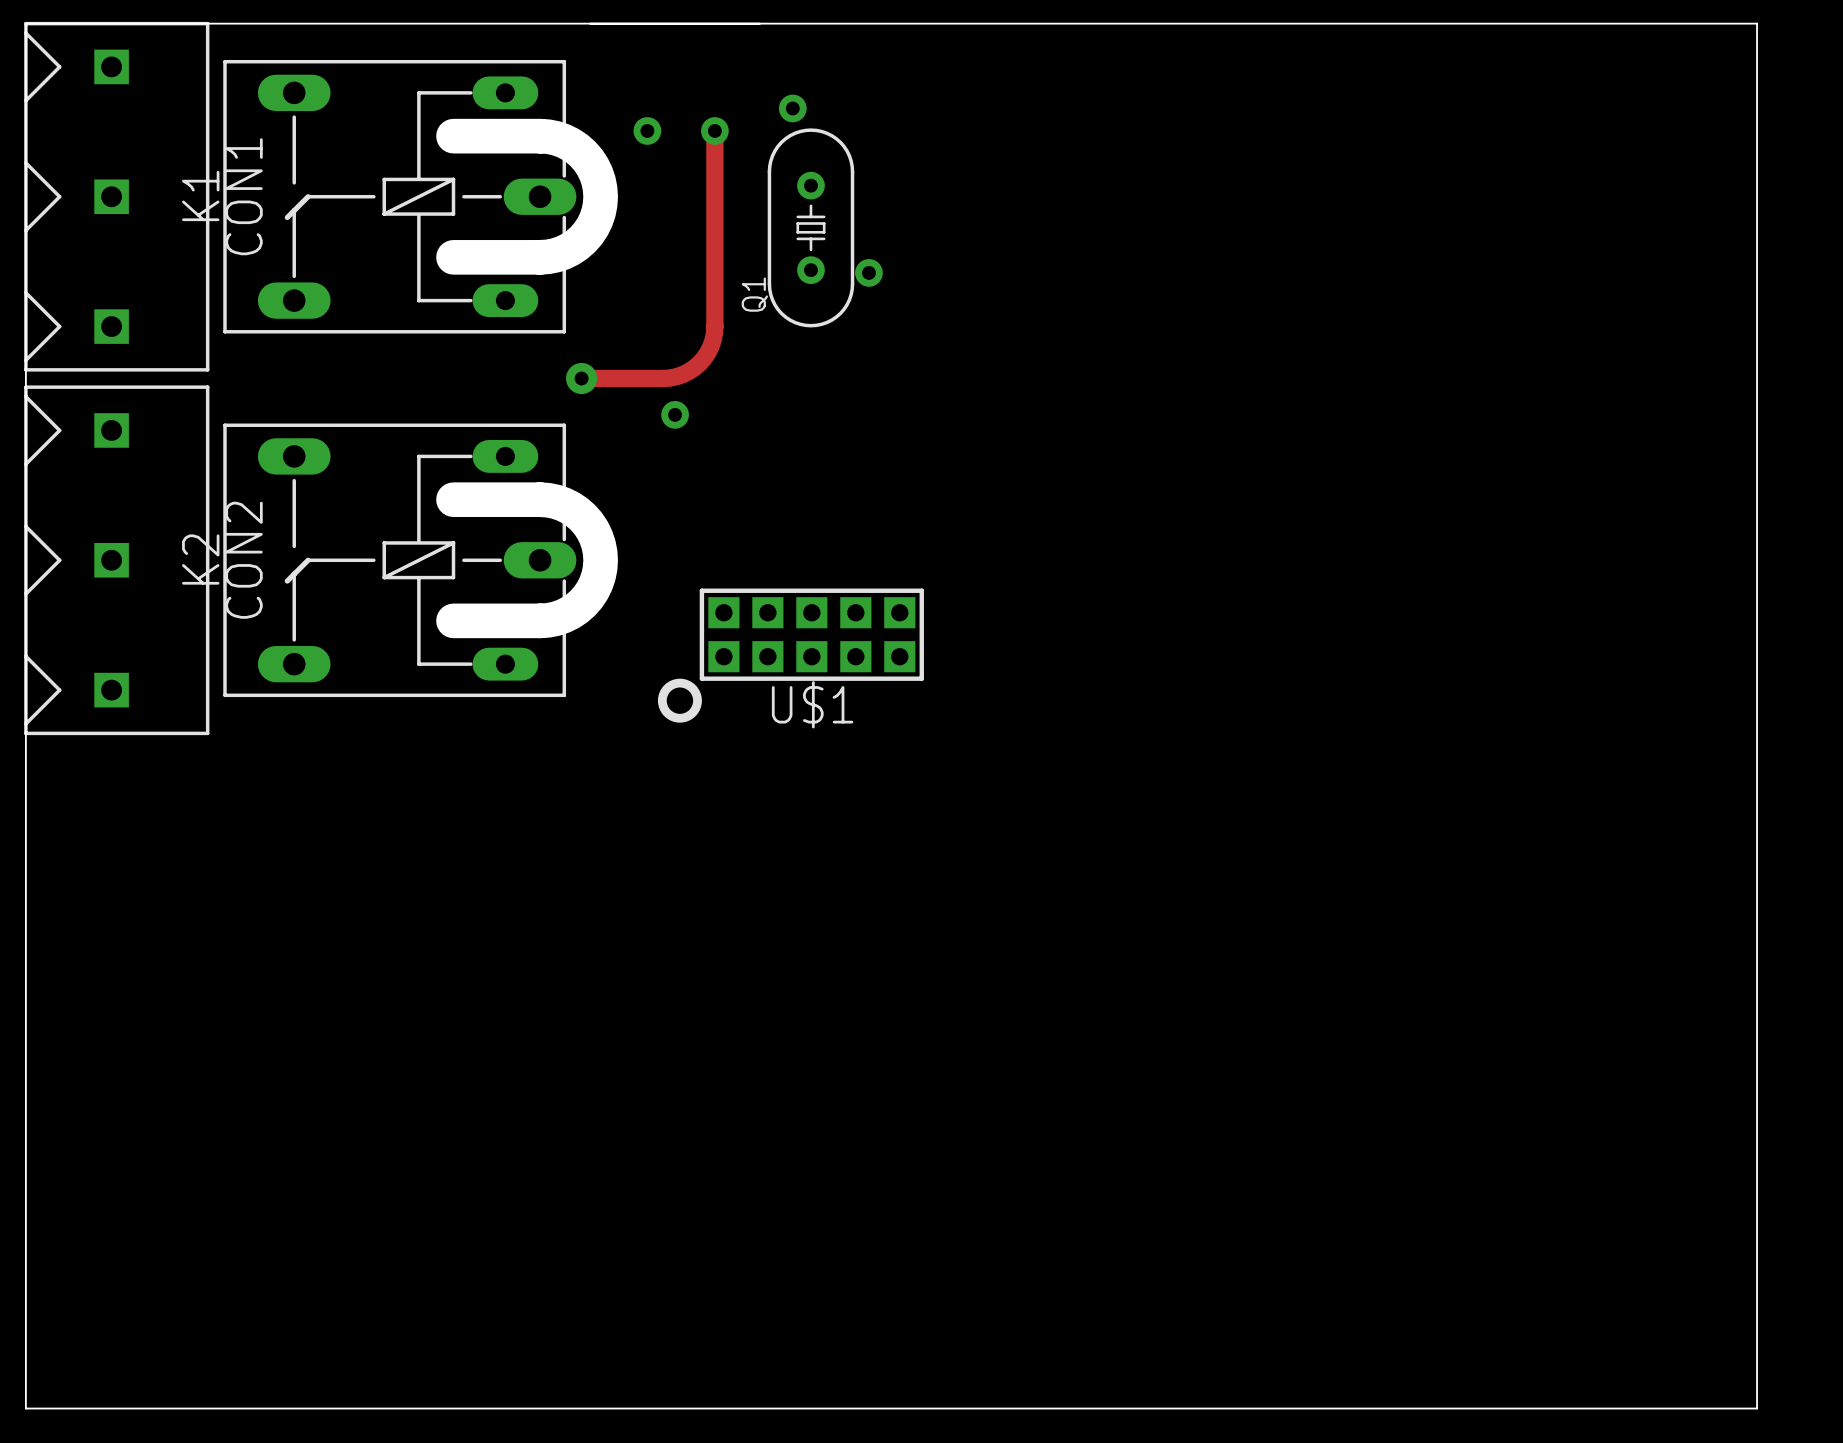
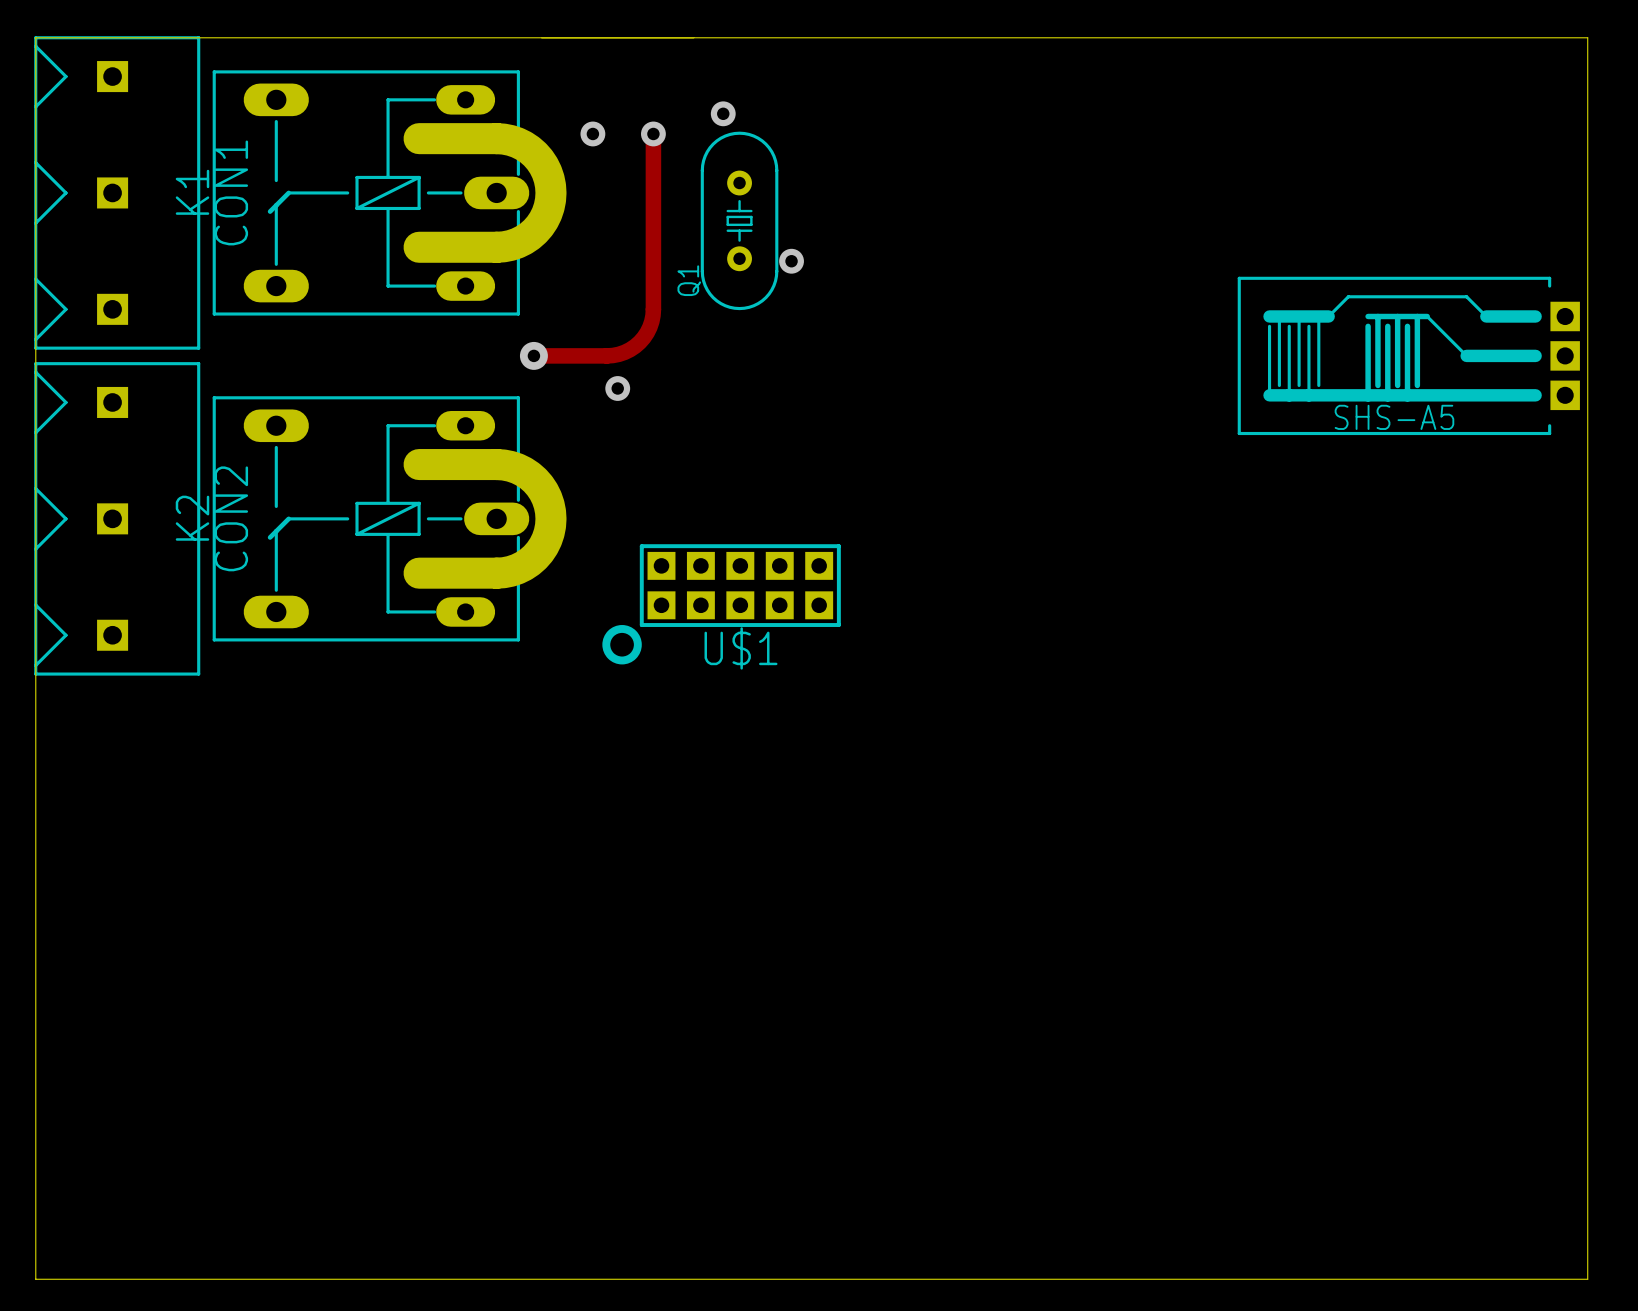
part: none -> (1408, 355)

